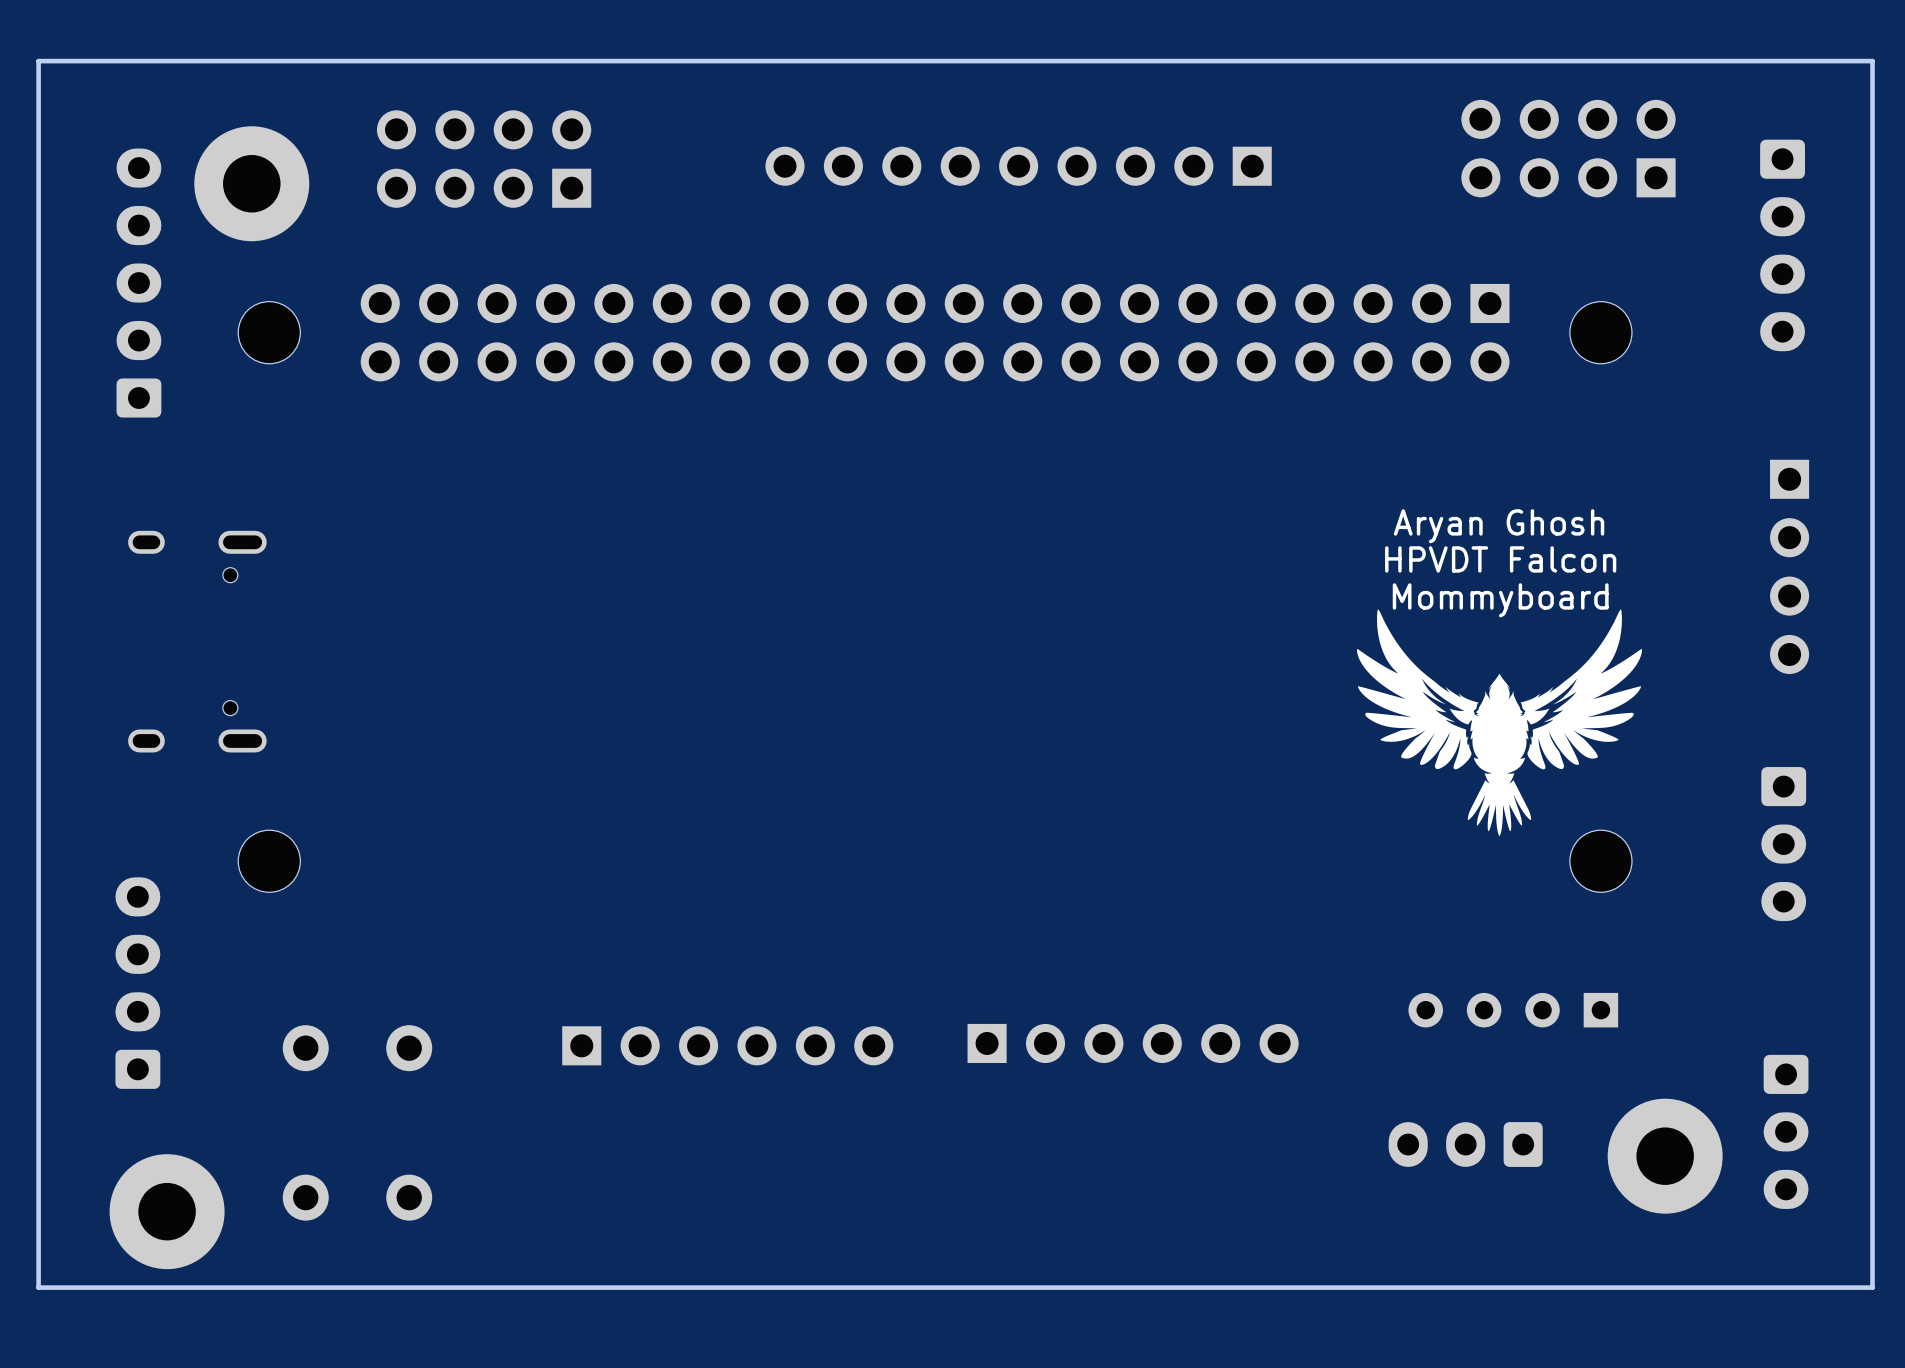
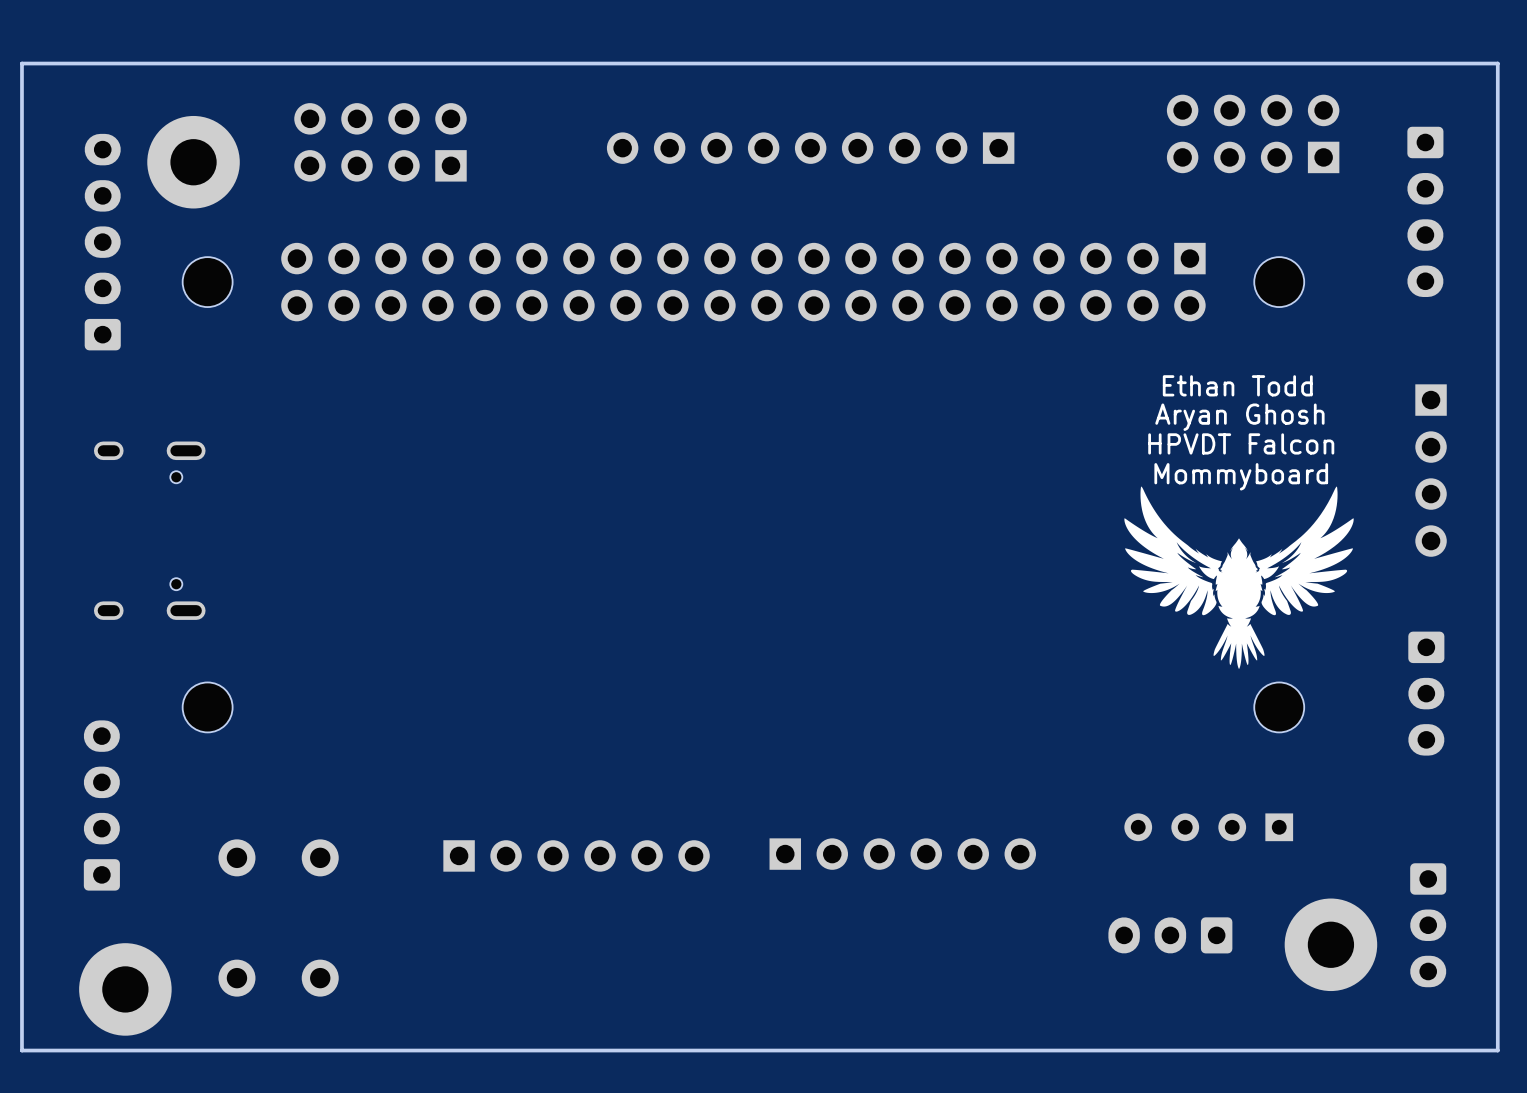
text: none -> Ethan Todd (1237, 385)
text position: Aryan Ghosh (1499, 526) -> Aryan Ghosh (1239, 417)
text position: HPVDT Falcon (1500, 559) -> HPVDT Falcon (1241, 443)
text position: Mommyboard (1500, 600) -> Mommyboard (1241, 476)
drawing position: (1499, 722) -> (1239, 577)

